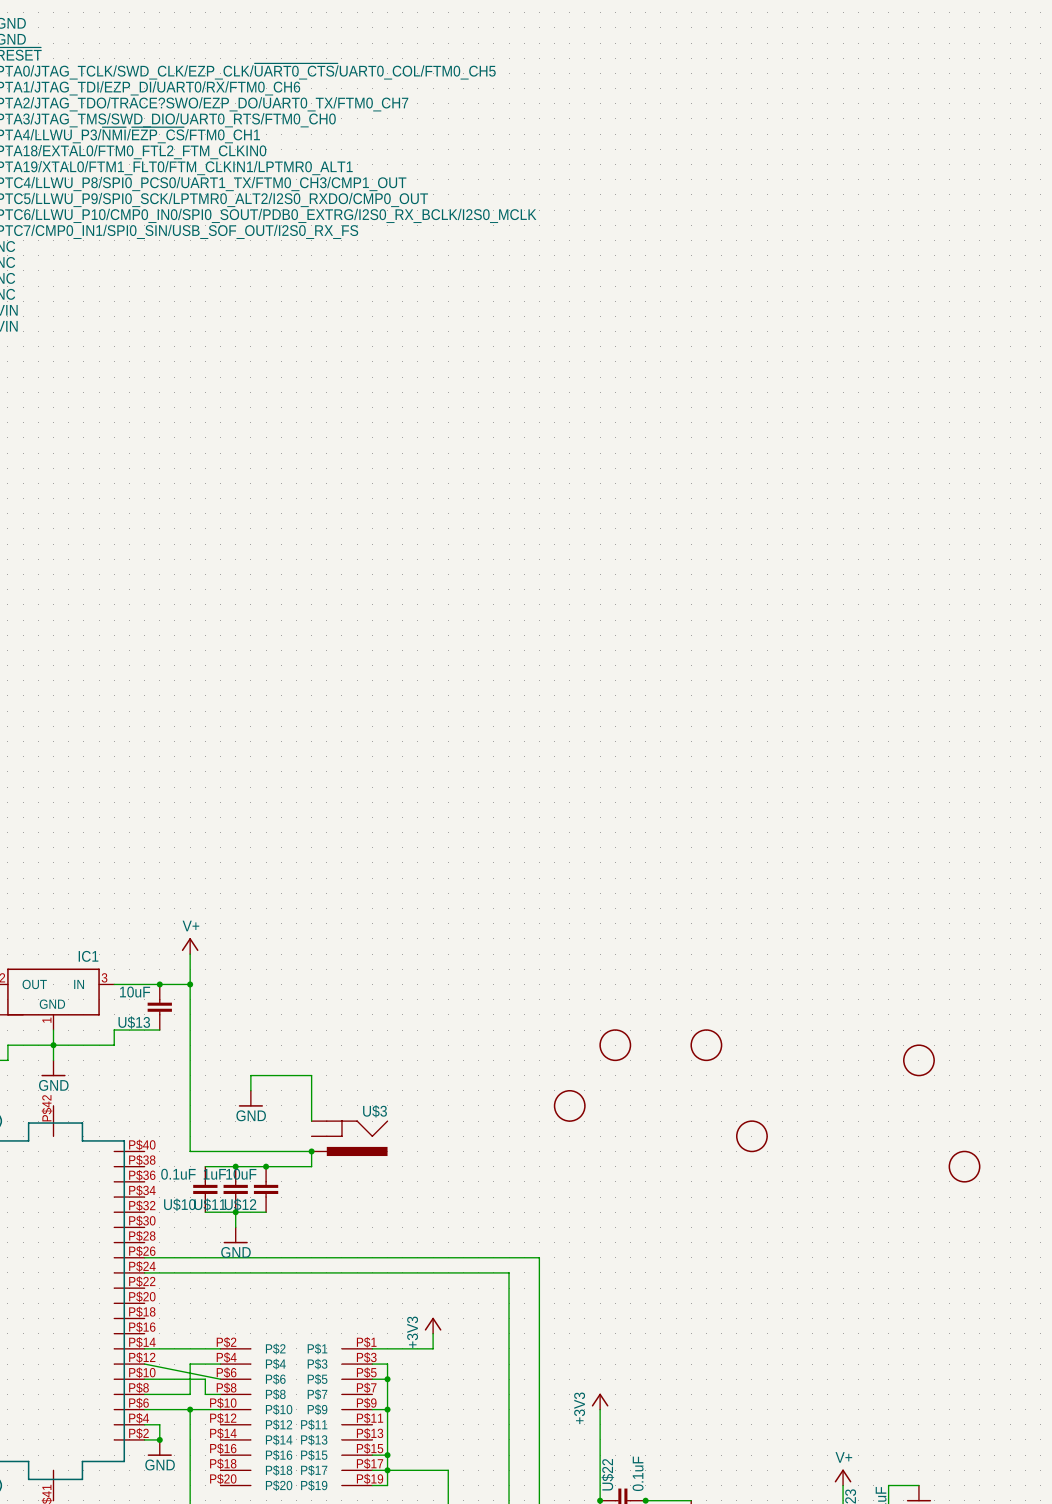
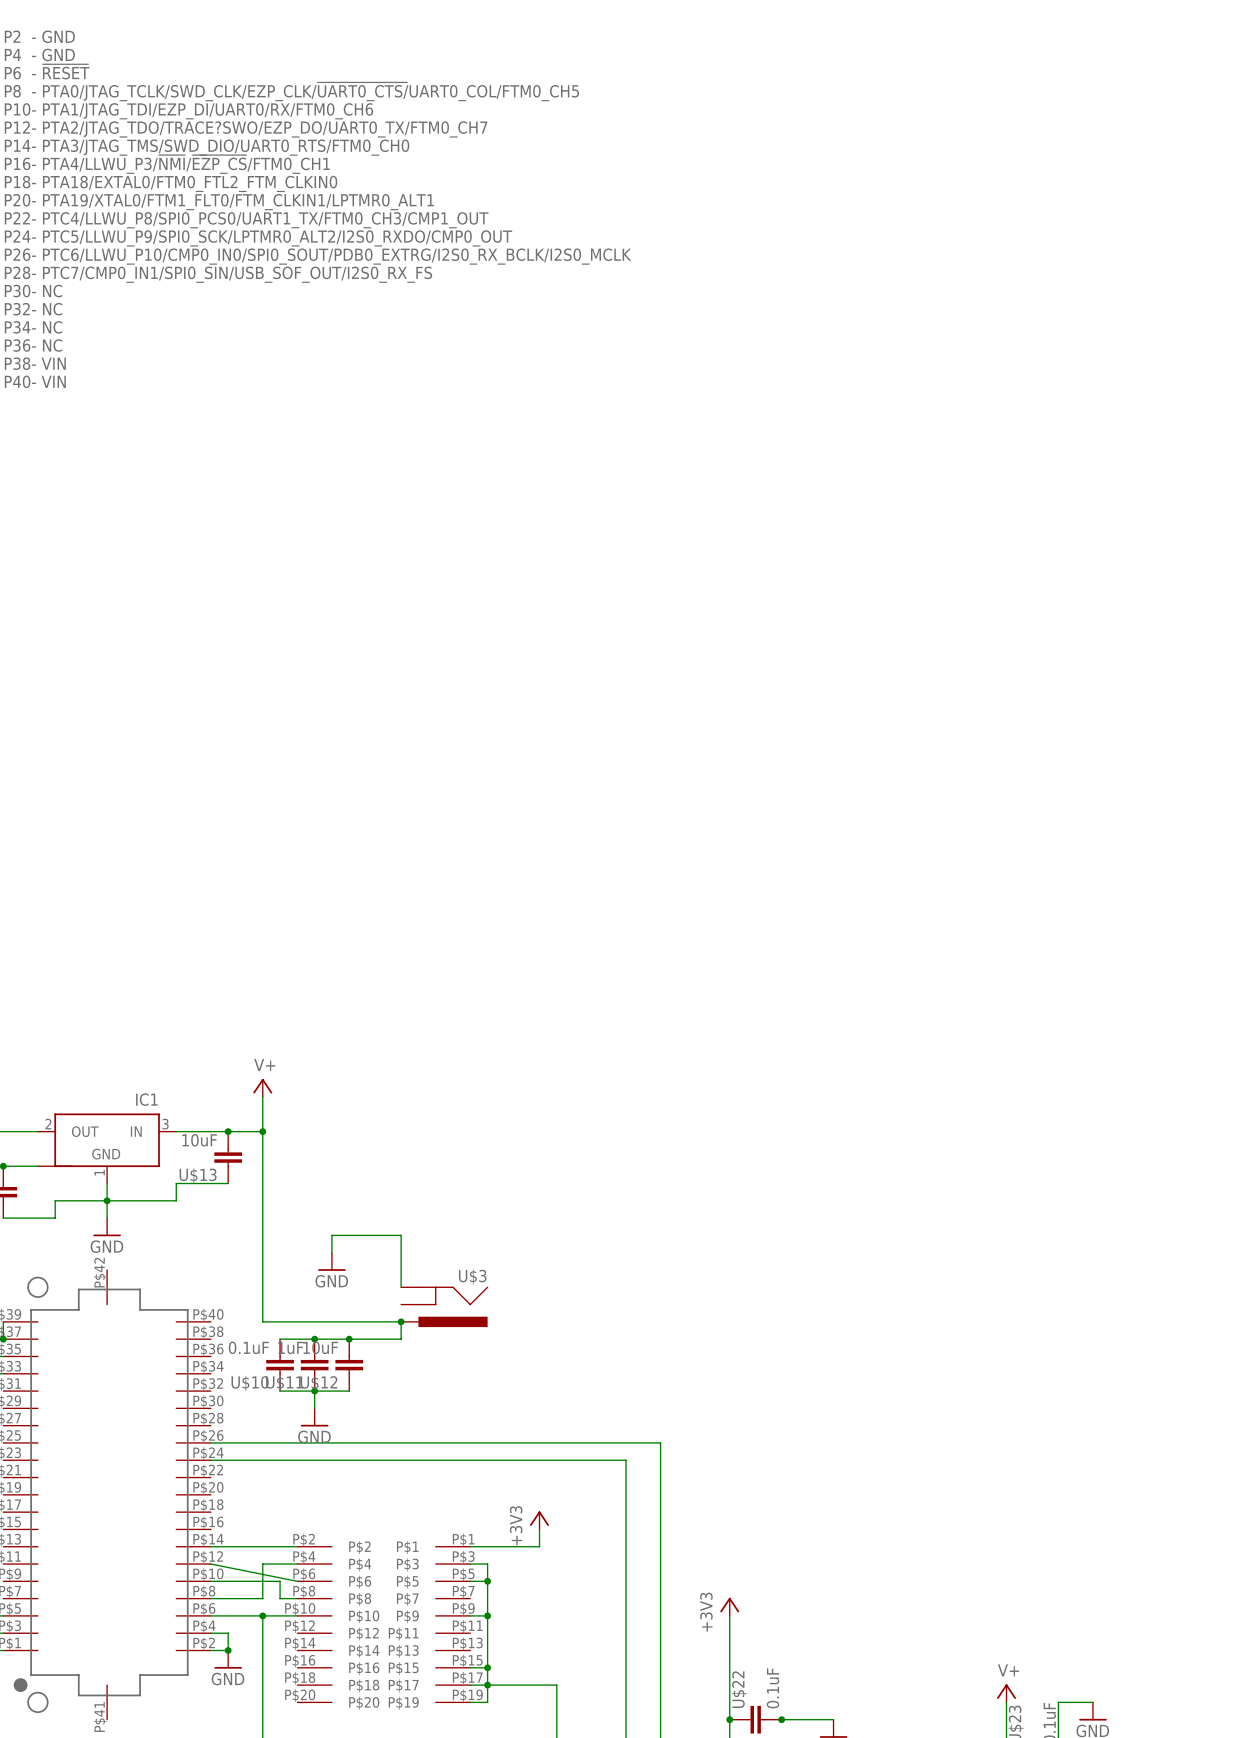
part: (615, 1045) -> none
part: (706, 1045) -> none
part: (918, 1060) -> none
part: (569, 1105) -> none
part: (751, 1136) -> none
part: (964, 1166) -> none

